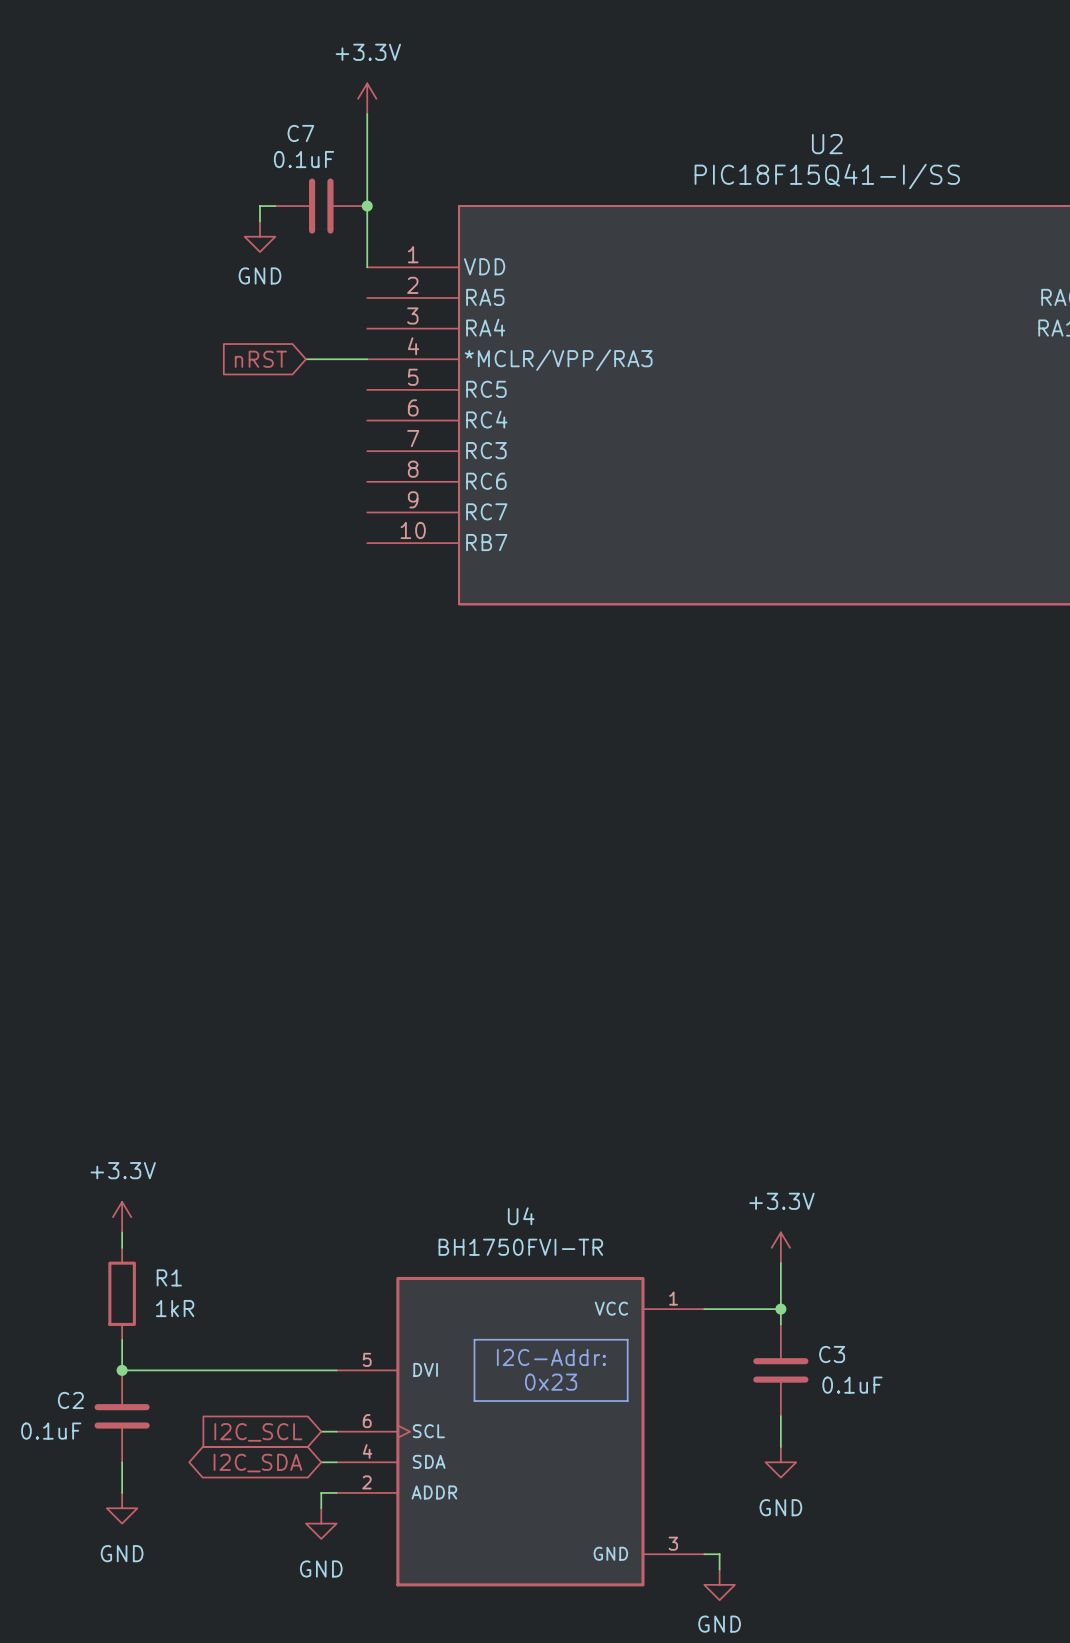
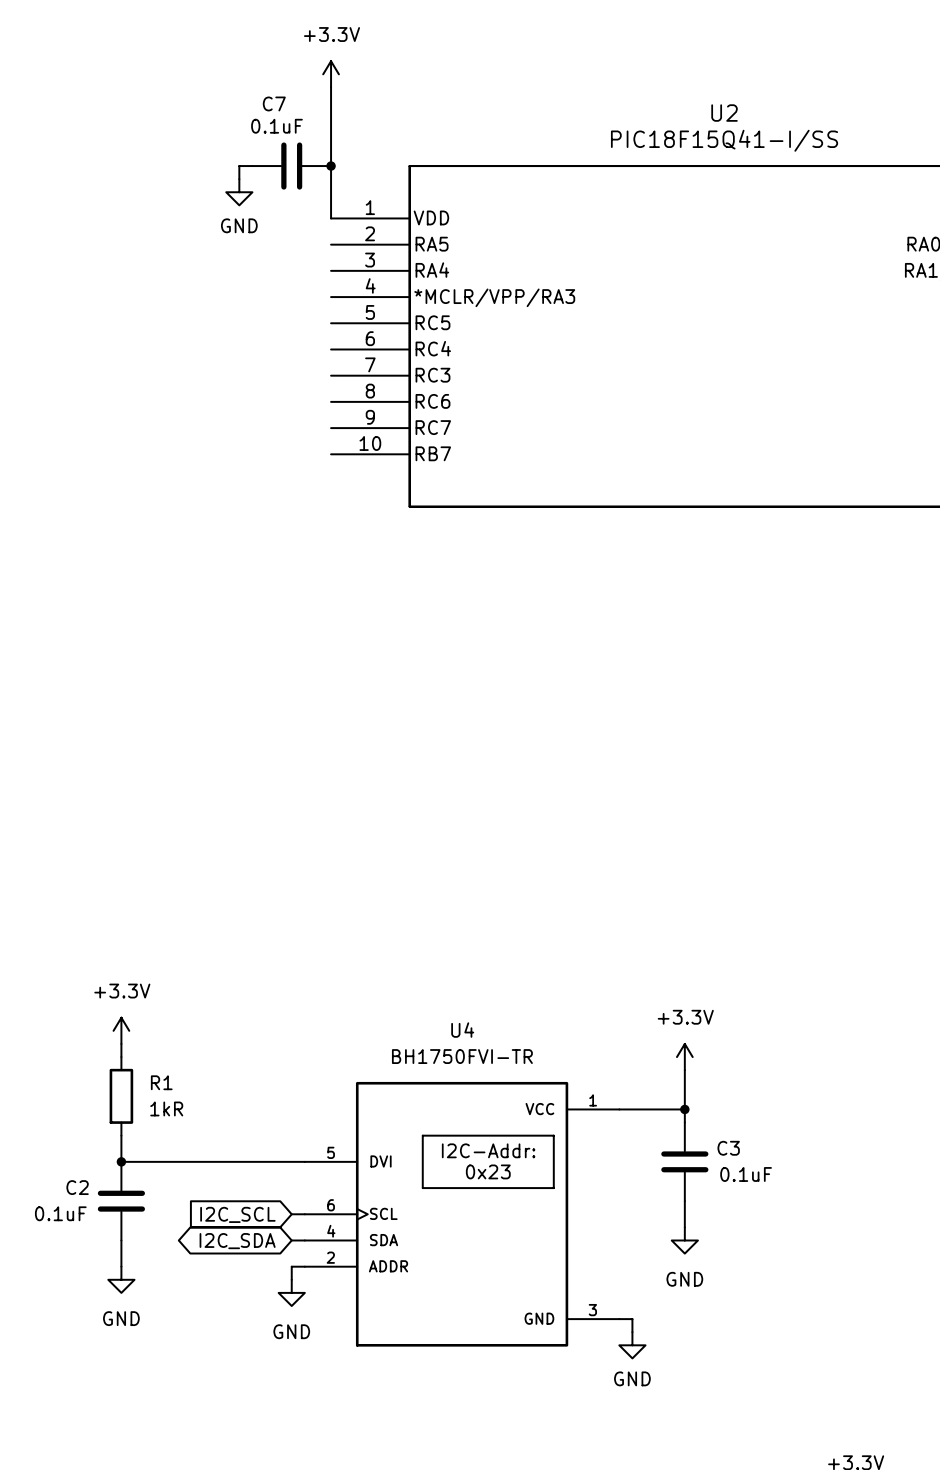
global label: nRST (260, 359) -> none
wire: (305, 359) (367, 359) -> none

